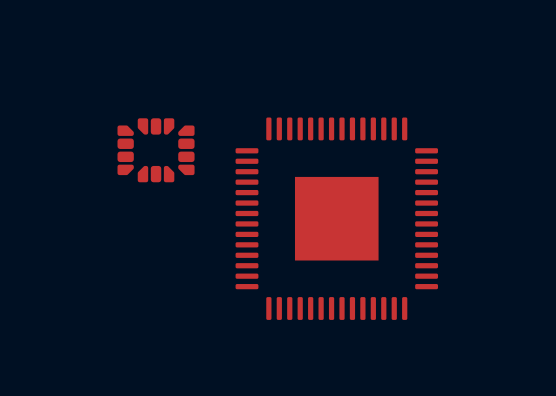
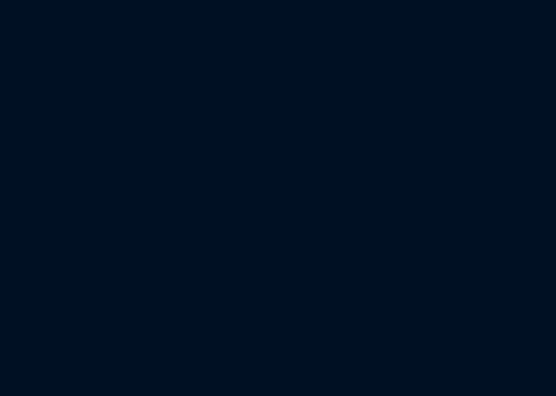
part: (156, 150) -> none
part: (336, 218) -> none

